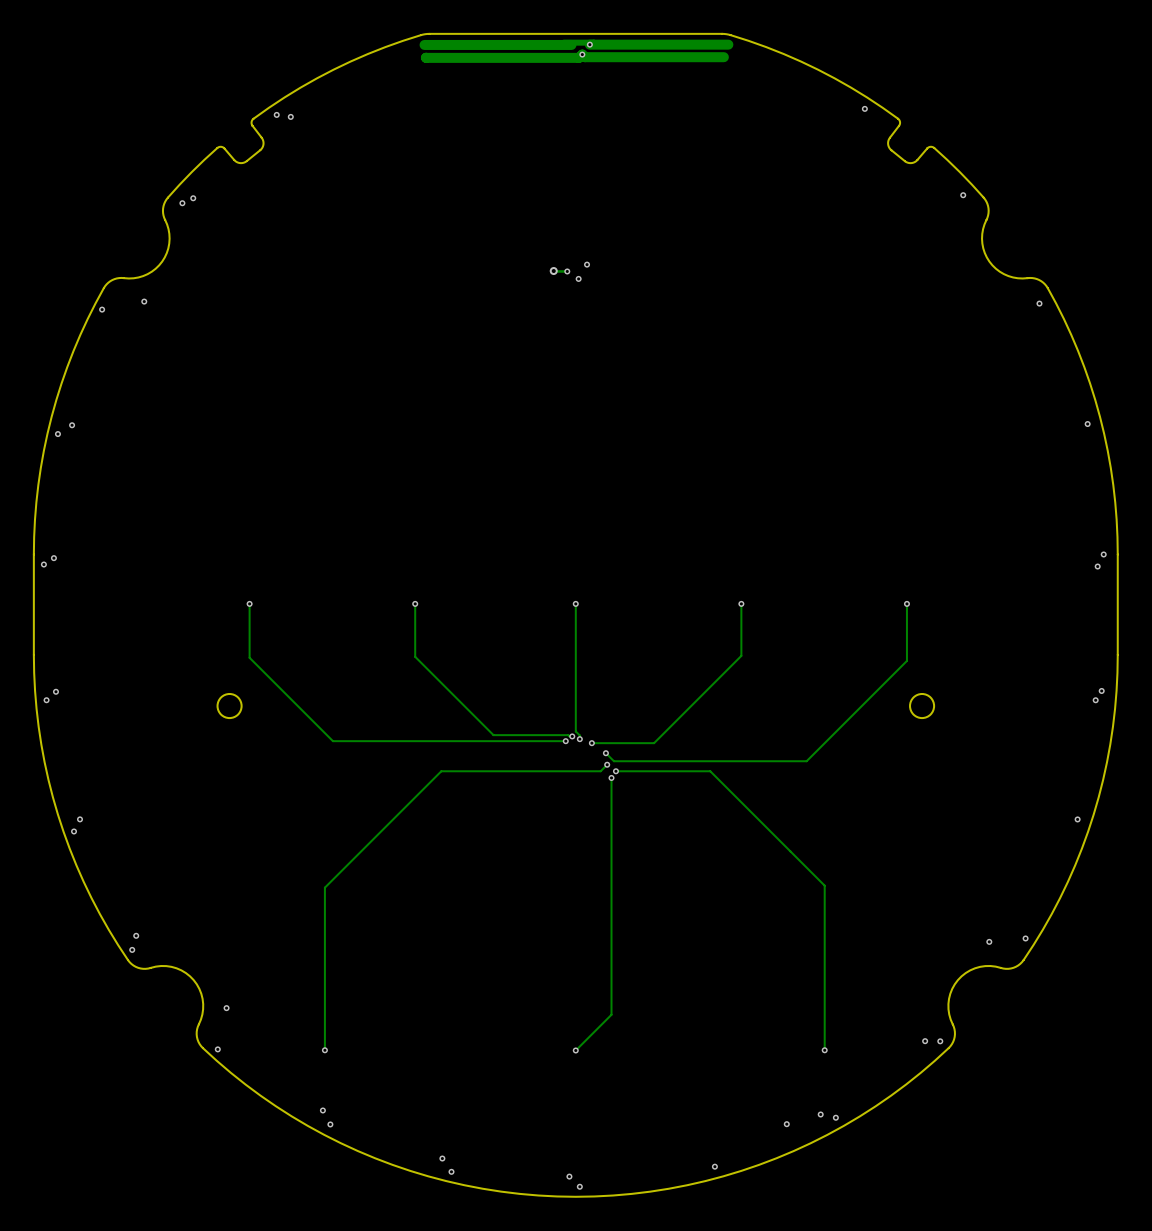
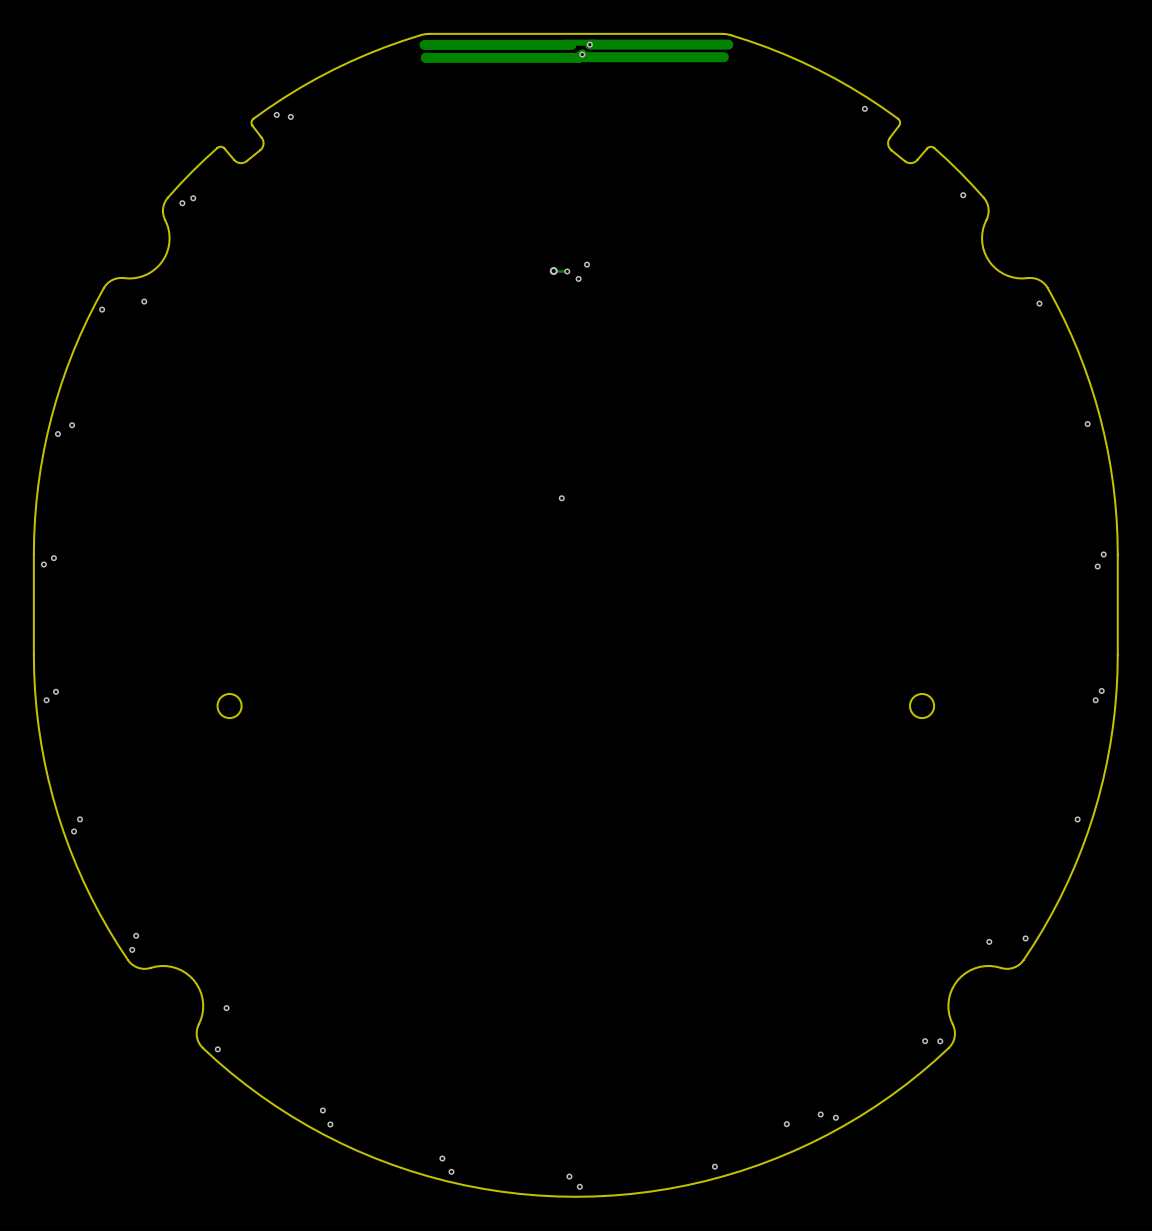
via: none -> (561, 498)
track: (249, 603) (249, 657) (332, 741) (565, 741) -> none
via: (249, 603) -> none
track: (415, 603) (415, 656) (493, 735) (572, 736) -> none
via: (415, 603) -> none
track: (575, 603) (575, 731) (579, 735) (579, 739) -> none
via: (575, 603) -> none
track: (741, 603) (741, 655) (654, 743) (591, 743) -> none
via: (741, 603) -> none
track: (906, 603) (906, 660) (806, 761) (613, 761) (605, 753) -> none
via: (906, 603) -> none
via: (572, 736) -> none
via: (579, 739) -> none
via: (565, 741) -> none
via: (591, 743) -> none
via: (605, 753) -> none
track: (607, 764) (600, 771) (441, 771) (324, 887) (324, 1050) -> none
via: (607, 764) -> none
track: (615, 771) (710, 771) (824, 885) (824, 1050) -> none
via: (615, 771) -> none
track: (611, 777) (611, 1014) (575, 1050) -> none
via: (611, 777) -> none
via: (324, 1050) -> none
via: (575, 1050) -> none
via: (824, 1050) -> none

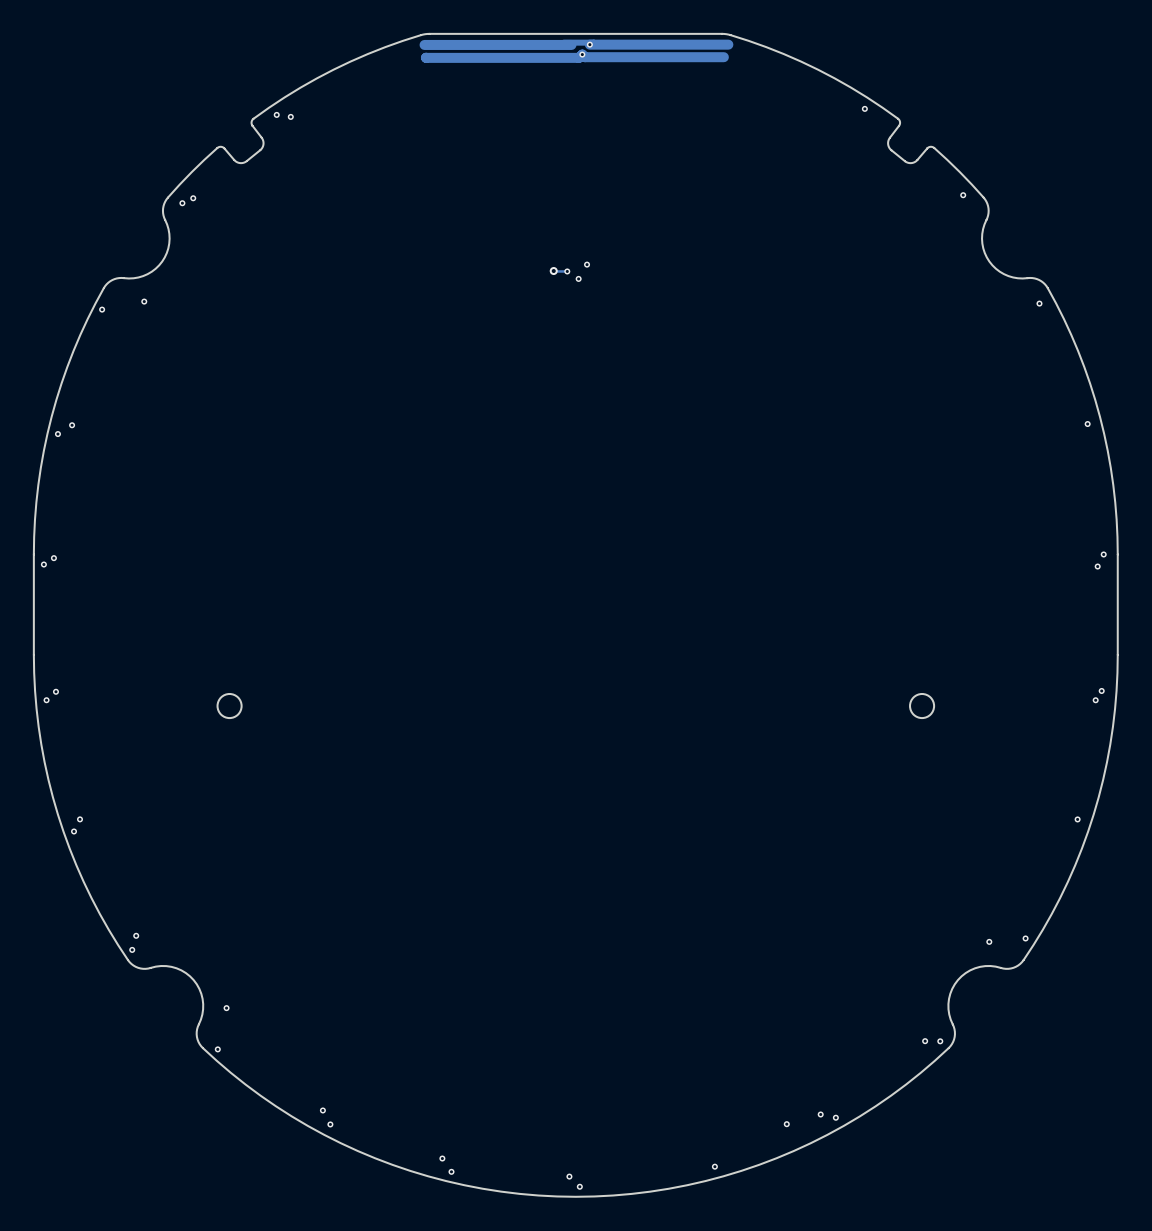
via: (561, 498) -> none

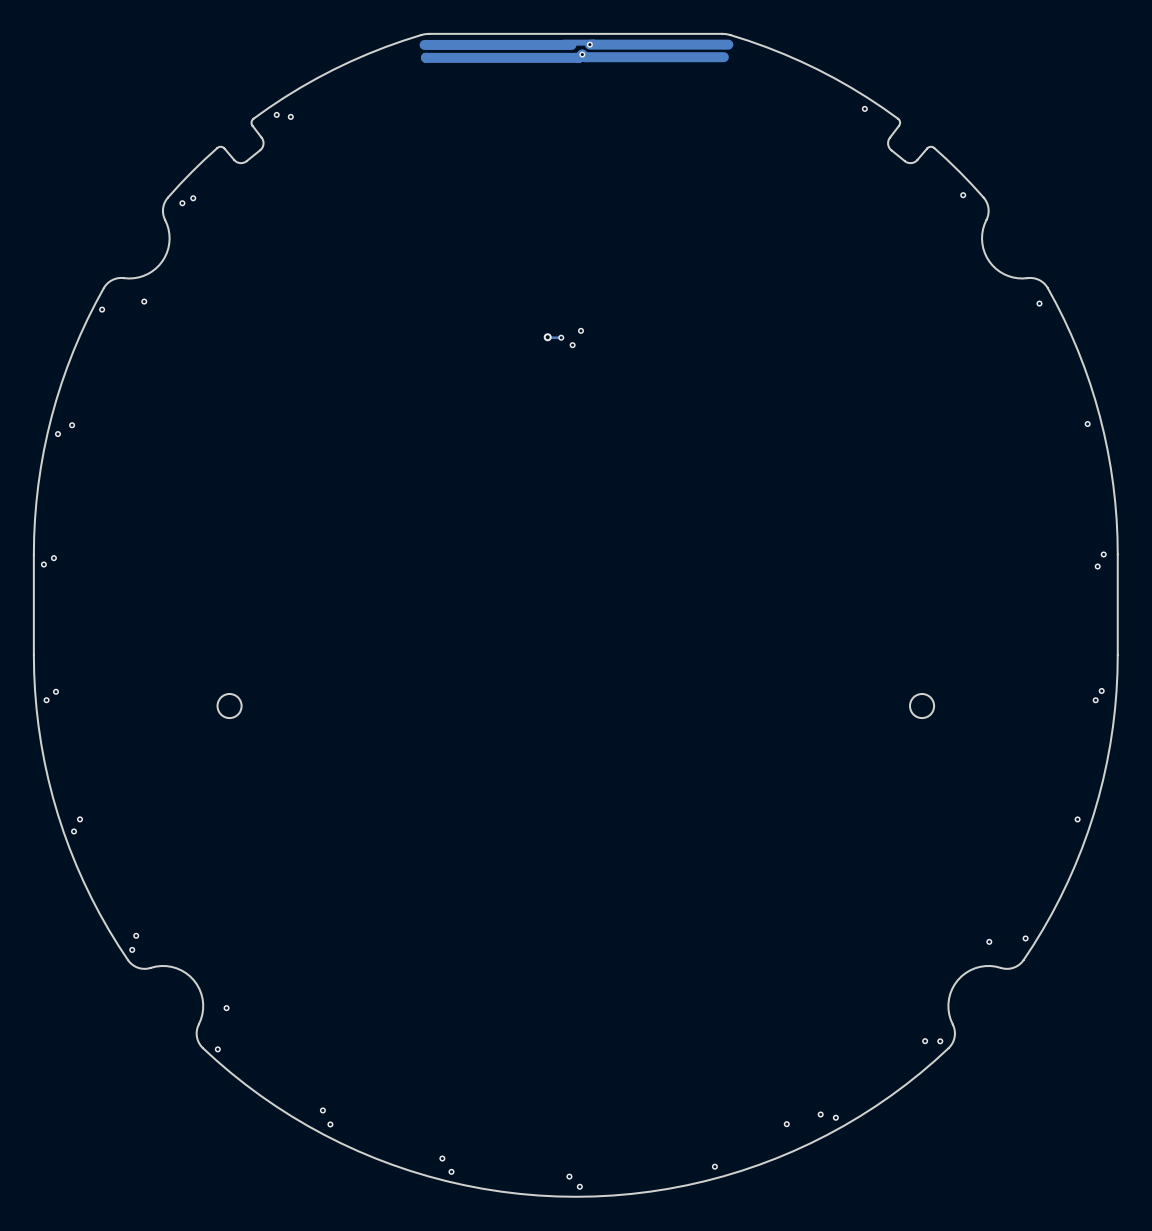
via: (587, 264) -> none
track: (553, 271) (567, 271) -> (547, 337) (561, 337)
via: (553, 271) -> none
via: (567, 271) -> none
via: (578, 278) -> none
via: none -> (581, 330)
via: none -> (547, 337)
via: none -> (561, 337)
via: none -> (572, 345)

